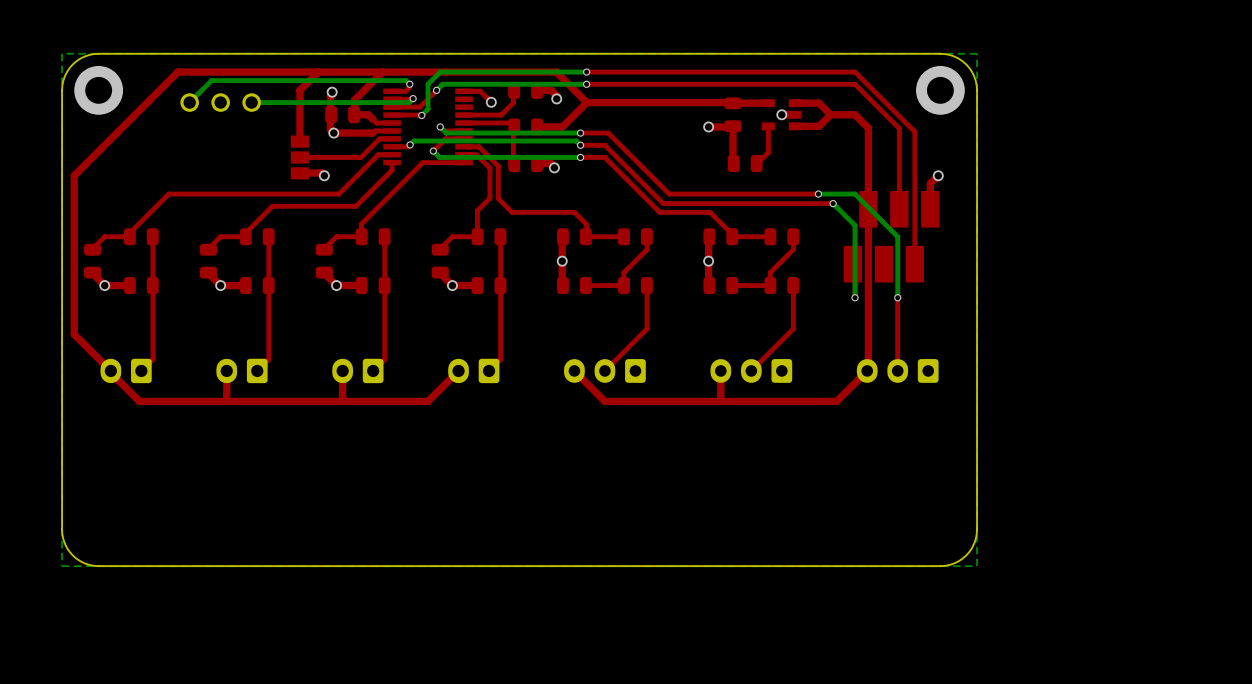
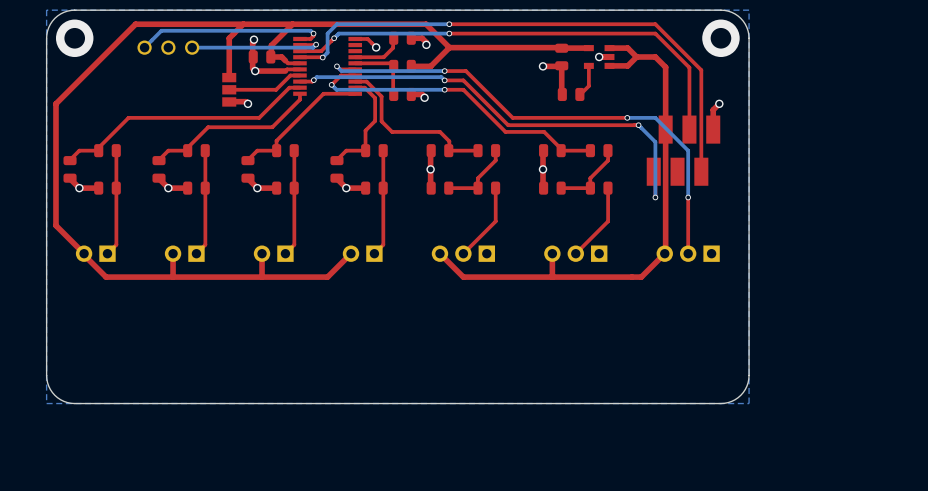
part footprint: [100, 358, 152, 384] -> [75, 245, 116, 262]
part footprint: [216, 358, 268, 384] -> [164, 245, 205, 262]
part footprint: [332, 358, 384, 384] -> [253, 245, 294, 262]
part footprint: [448, 358, 500, 384] -> [342, 245, 383, 262]
part footprint: [564, 359, 646, 383] -> [431, 245, 496, 262]
part footprint: [710, 359, 793, 383] -> [544, 245, 608, 262]
part footprint: [856, 359, 939, 383] -> [656, 245, 720, 262]

